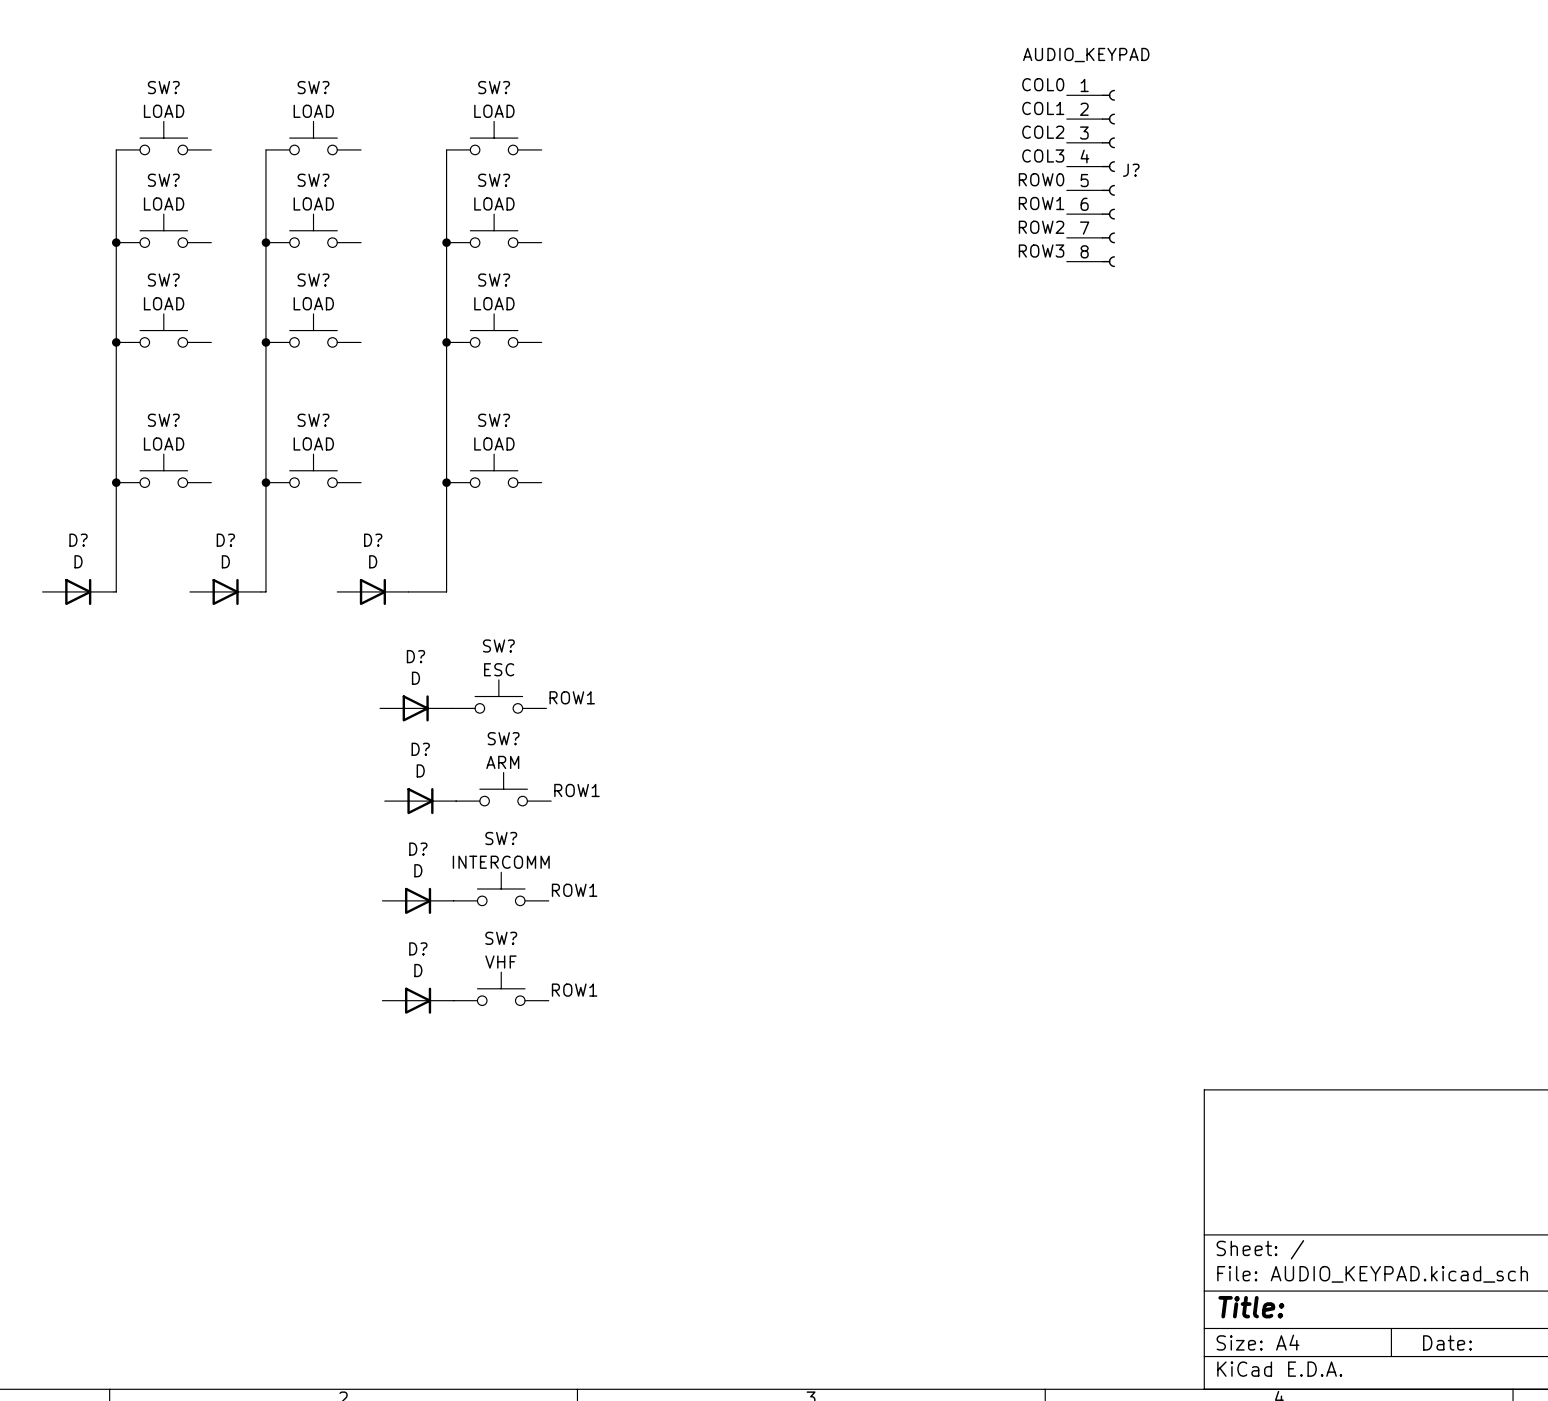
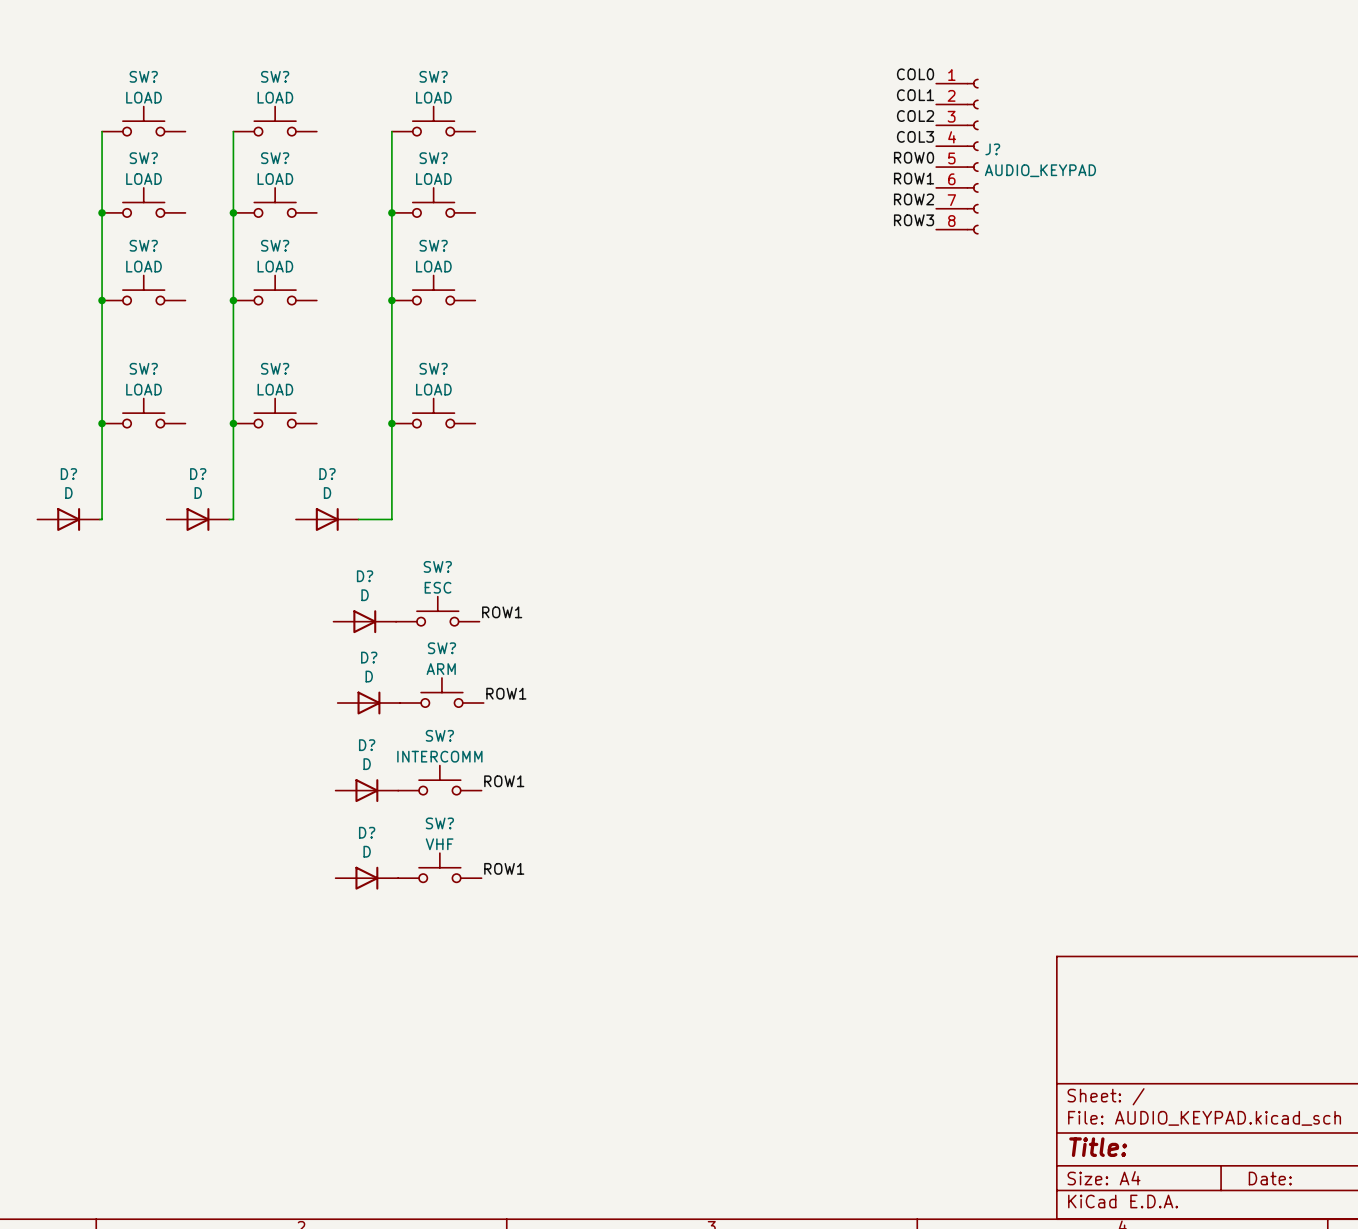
J? value position: AUDIO_KEYPAD (1086, 55) -> AUDIO_KEYPAD (1040, 170)

